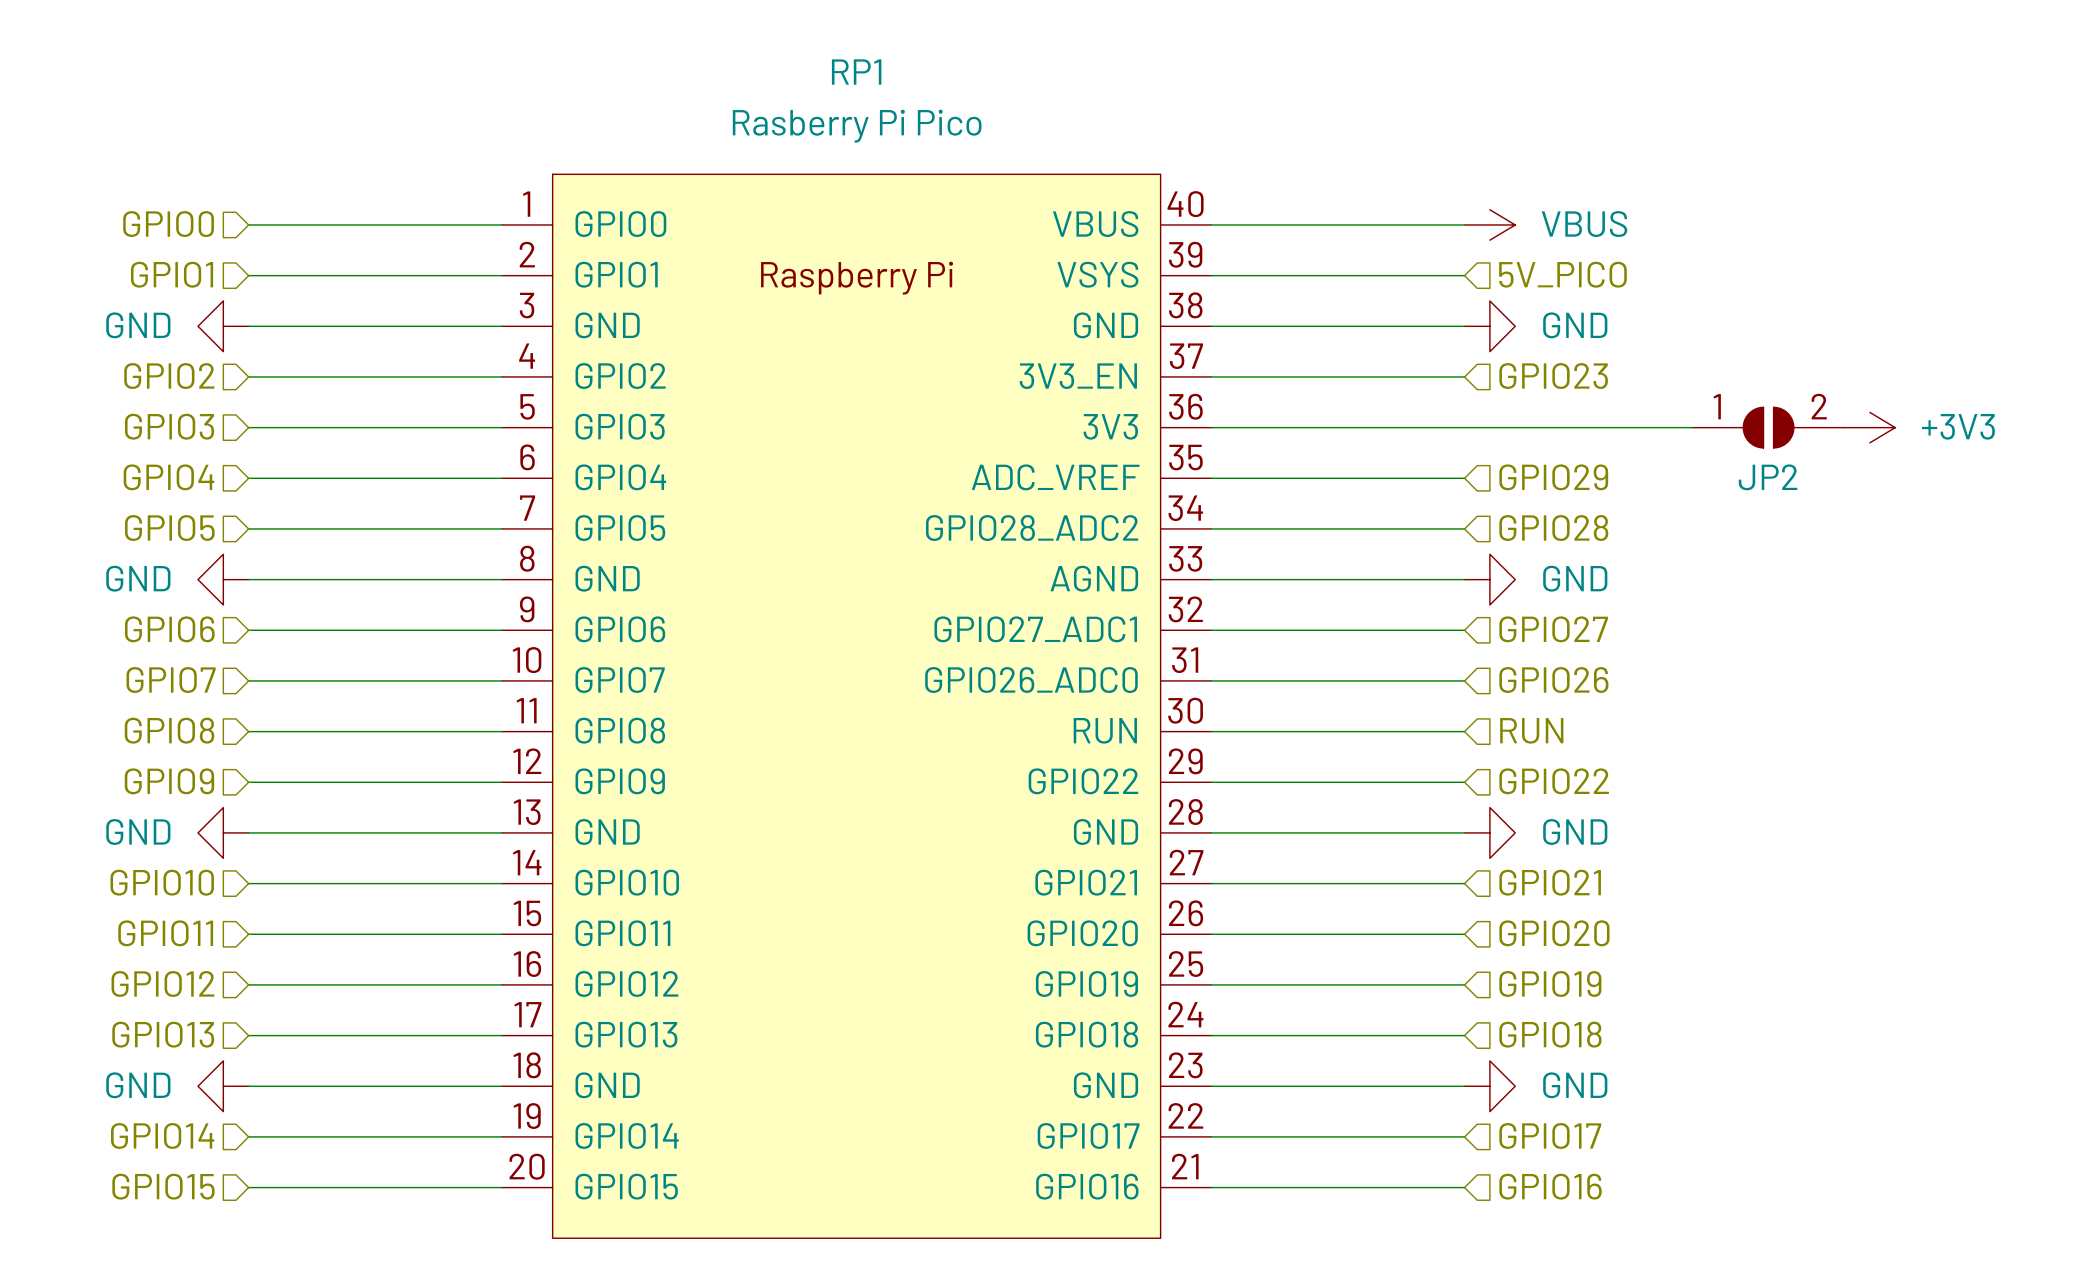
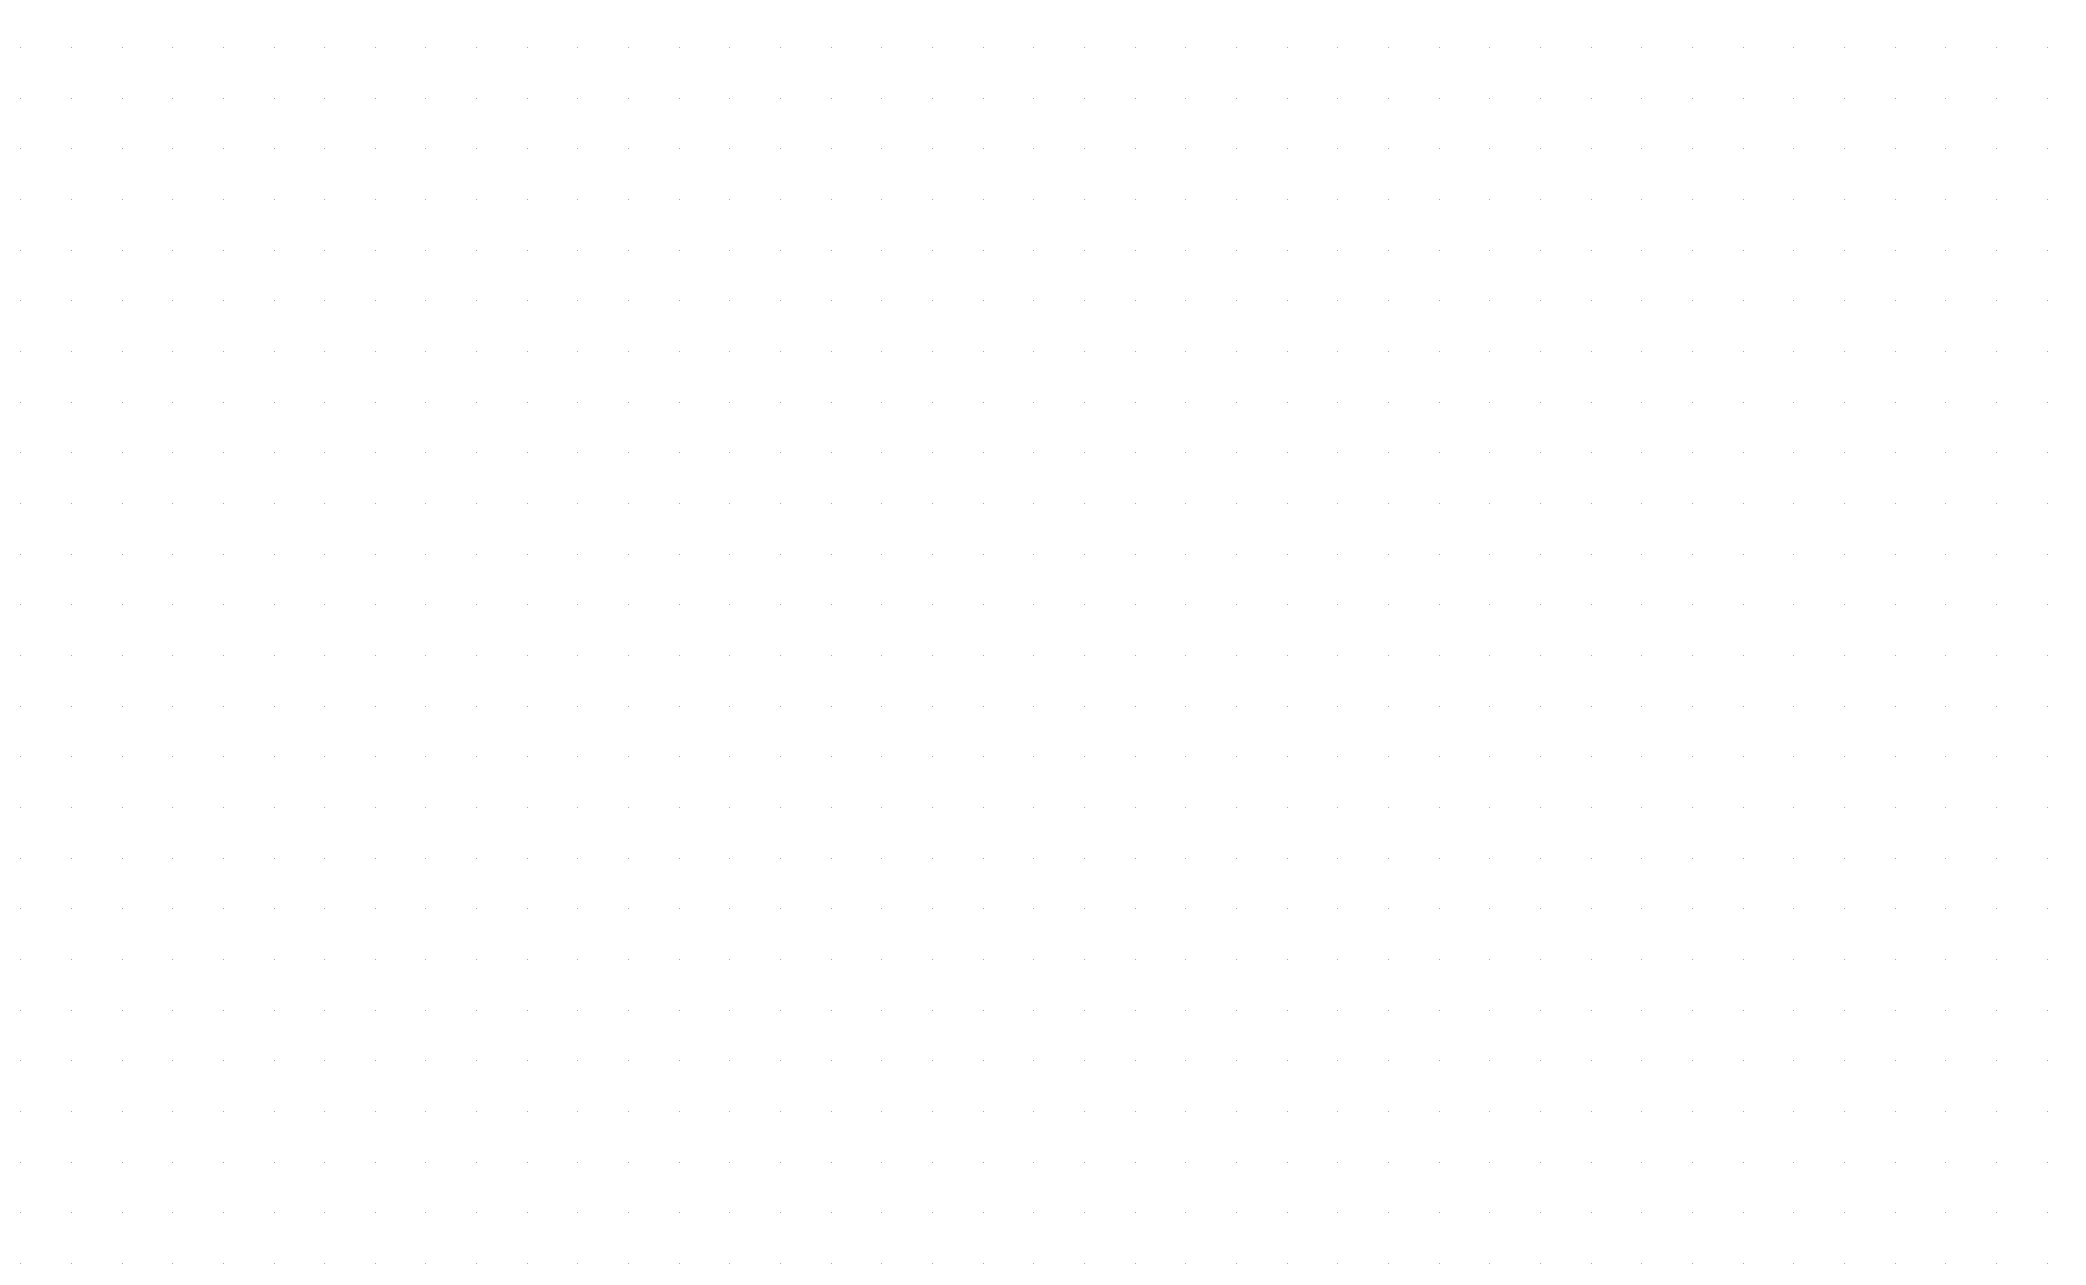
hierarchical label: GPIO0 (168, 224) -> none
wire: (248, 224) (501, 224) -> none
wire: (1211, 224) (1464, 224) -> none
power symbol: VBUS (1489, 224) -> none
hierarchical label: GPIO1 (172, 274) -> none
hierarchical label: 5V_PICO (1562, 274) -> none
wire: (248, 275) (501, 275) -> none
wire: (1211, 275) (1464, 275) -> none
power symbol: GND (223, 326) -> none
wire: (248, 326) (501, 326) -> none
wire: (1211, 326) (1464, 326) -> none
power symbol: GND (1489, 326) -> none
hierarchical label: GPIO2 (169, 376) -> none
wire: (248, 376) (501, 376) -> none
wire: (1211, 376) (1464, 376) -> none
hierarchical label: GPIO23 (1553, 376) -> none
hierarchical label: GPIO3 (169, 426) -> none
wire: (248, 427) (501, 427) -> none
wire: (1211, 427) (1692, 427) -> none
JP2: (1768, 427) -> none
power symbol: +3V3 (1869, 427) -> none
hierarchical label: GPIO4 (168, 477) -> none
hierarchical label: GPIO29 (1553, 477) -> none
wire: (248, 478) (501, 478) -> none
wire: (1211, 478) (1464, 478) -> none
hierarchical label: GPIO28 (1553, 527) -> none
hierarchical label: GPIO5 (169, 528) -> none
wire: (248, 528) (501, 528) -> none
wire: (1211, 528) (1464, 528) -> none
power symbol: GND (223, 579) -> none
wire: (248, 579) (501, 579) -> none
wire: (1211, 579) (1464, 579) -> none
power symbol: GND (1489, 579) -> none
hierarchical label: GPIO6 (169, 629) -> none
hierarchical label: GPIO27 (1553, 629) -> none
wire: (248, 630) (501, 630) -> none
wire: (1211, 630) (1464, 630) -> none
hierarchical label: GPIO7 (171, 680) -> none
wire: (248, 680) (501, 680) -> none
wire: (1211, 680) (1464, 680) -> none
hierarchical label: GPIO26 (1553, 680) -> none
RP1: Rasberry Pi Pico (856, 706) -> none
hierarchical label: GPIO8 (169, 730) -> none
hierarchical label: RUN (1531, 730) -> none
wire: (248, 731) (501, 731) -> none
wire: (1211, 731) (1464, 731) -> none
hierarchical label: GPIO9 (169, 781) -> none
hierarchical label: GPIO22 (1554, 781) -> none
wire: (248, 782) (501, 782) -> none
wire: (1211, 782) (1464, 782) -> none
power symbol: GND (223, 832) -> none
wire: (248, 832) (501, 832) -> none
wire: (1211, 832) (1464, 832) -> none
power symbol: GND (1489, 832) -> none
hierarchical label: GPIO10 (162, 882) -> none
hierarchical label: GPIO21 (1550, 882) -> none
wire: (248, 883) (501, 883) -> none
wire: (1211, 883) (1464, 883) -> none
hierarchical label: GPIO11 (165, 933) -> none
hierarchical label: GPIO20 (1554, 933) -> none
wire: (248, 934) (501, 934) -> none
wire: (1211, 934) (1464, 934) -> none
hierarchical label: GPIO12 (162, 983) -> none
hierarchical label: GPIO19 (1550, 983) -> none
wire: (248, 984) (501, 984) -> none
wire: (1211, 984) (1464, 984) -> none
hierarchical label: GPIO13 (163, 1034) -> none
hierarchical label: GPIO18 (1550, 1034) -> none
wire: (248, 1035) (501, 1035) -> none
wire: (1211, 1035) (1464, 1035) -> none
power symbol: GND (223, 1086) -> none
wire: (248, 1086) (501, 1086) -> none
wire: (1211, 1086) (1464, 1086) -> none
power symbol: GND (1489, 1086) -> none
hierarchical label: GPIO14 (162, 1135) -> none
hierarchical label: GPIO17 (1550, 1135) -> none
wire: (248, 1136) (501, 1136) -> none
wire: (1211, 1136) (1464, 1136) -> none
hierarchical label: GPIO15 (163, 1186) -> none
hierarchical label: GPIO16 (1550, 1186) -> none
wire: (248, 1187) (501, 1187) -> none
wire: (1211, 1187) (1464, 1187) -> none

